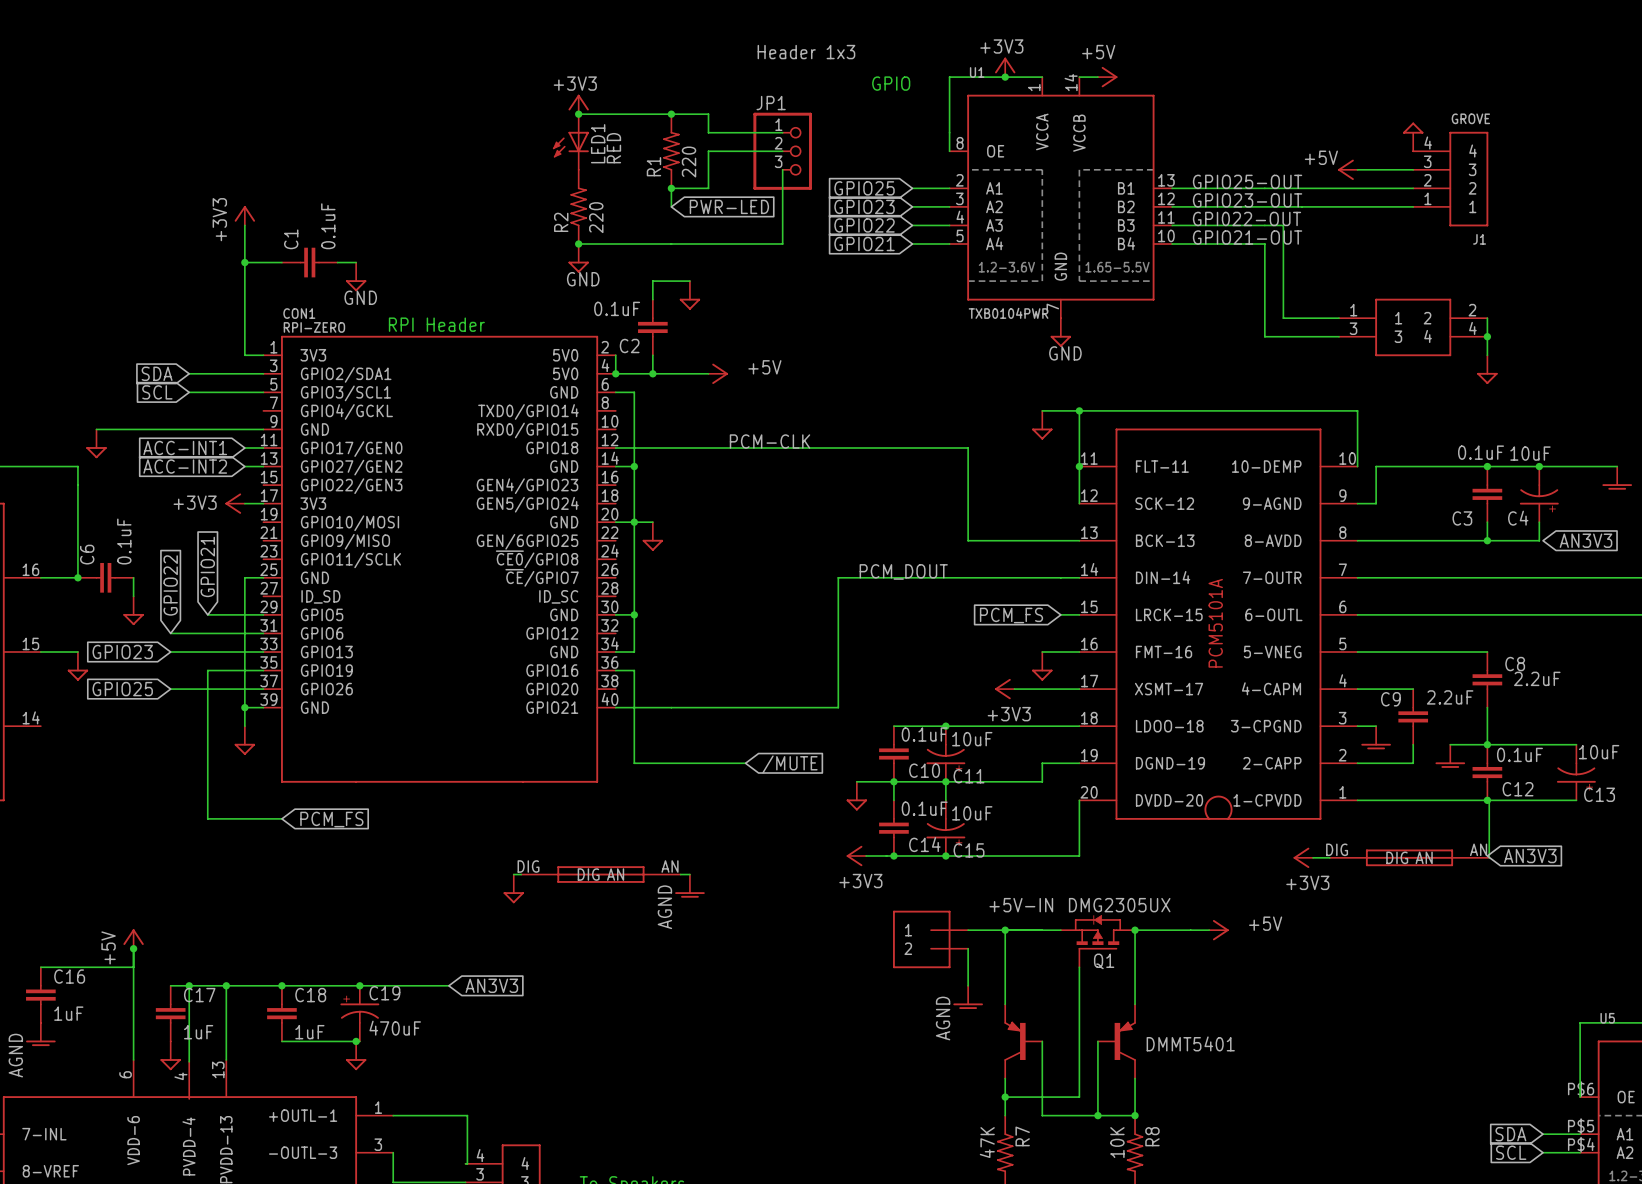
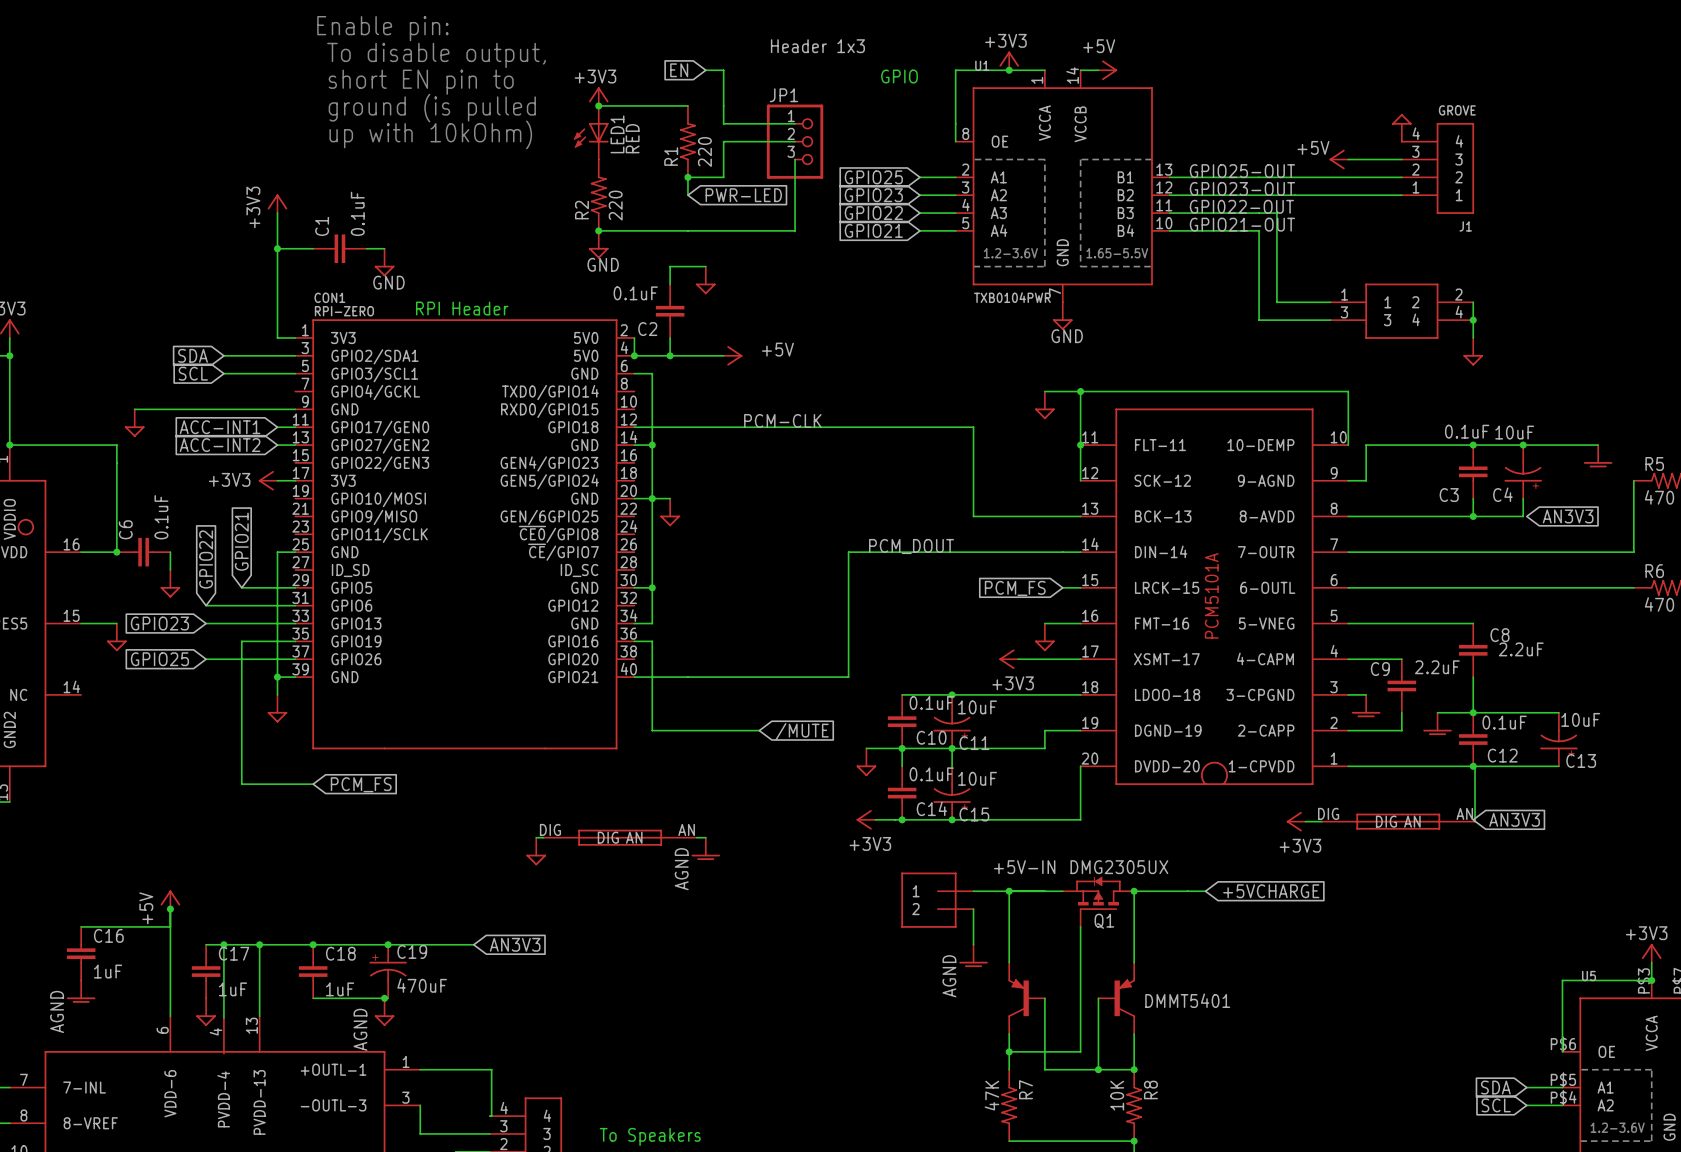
text: none -> Enable pin: (382, 28)
text: none -> To disable output, (436, 55)
global label: none -> EN (679, 70)
text: none -> short EN pin to (421, 82)
wire: (671, 114) (708, 114) -> (705, 70) (723, 70) (723, 105)
junction: (671, 114) -> none
text: none -> ground (is pulled (432, 108)
text: none -> up with 10kOhm) (430, 134)
power symbol: +5V (1218, 930) -> none
global label: none -> +5VCHARGE (1271, 891)
power symbol text: none -> AGND (360, 1029)

